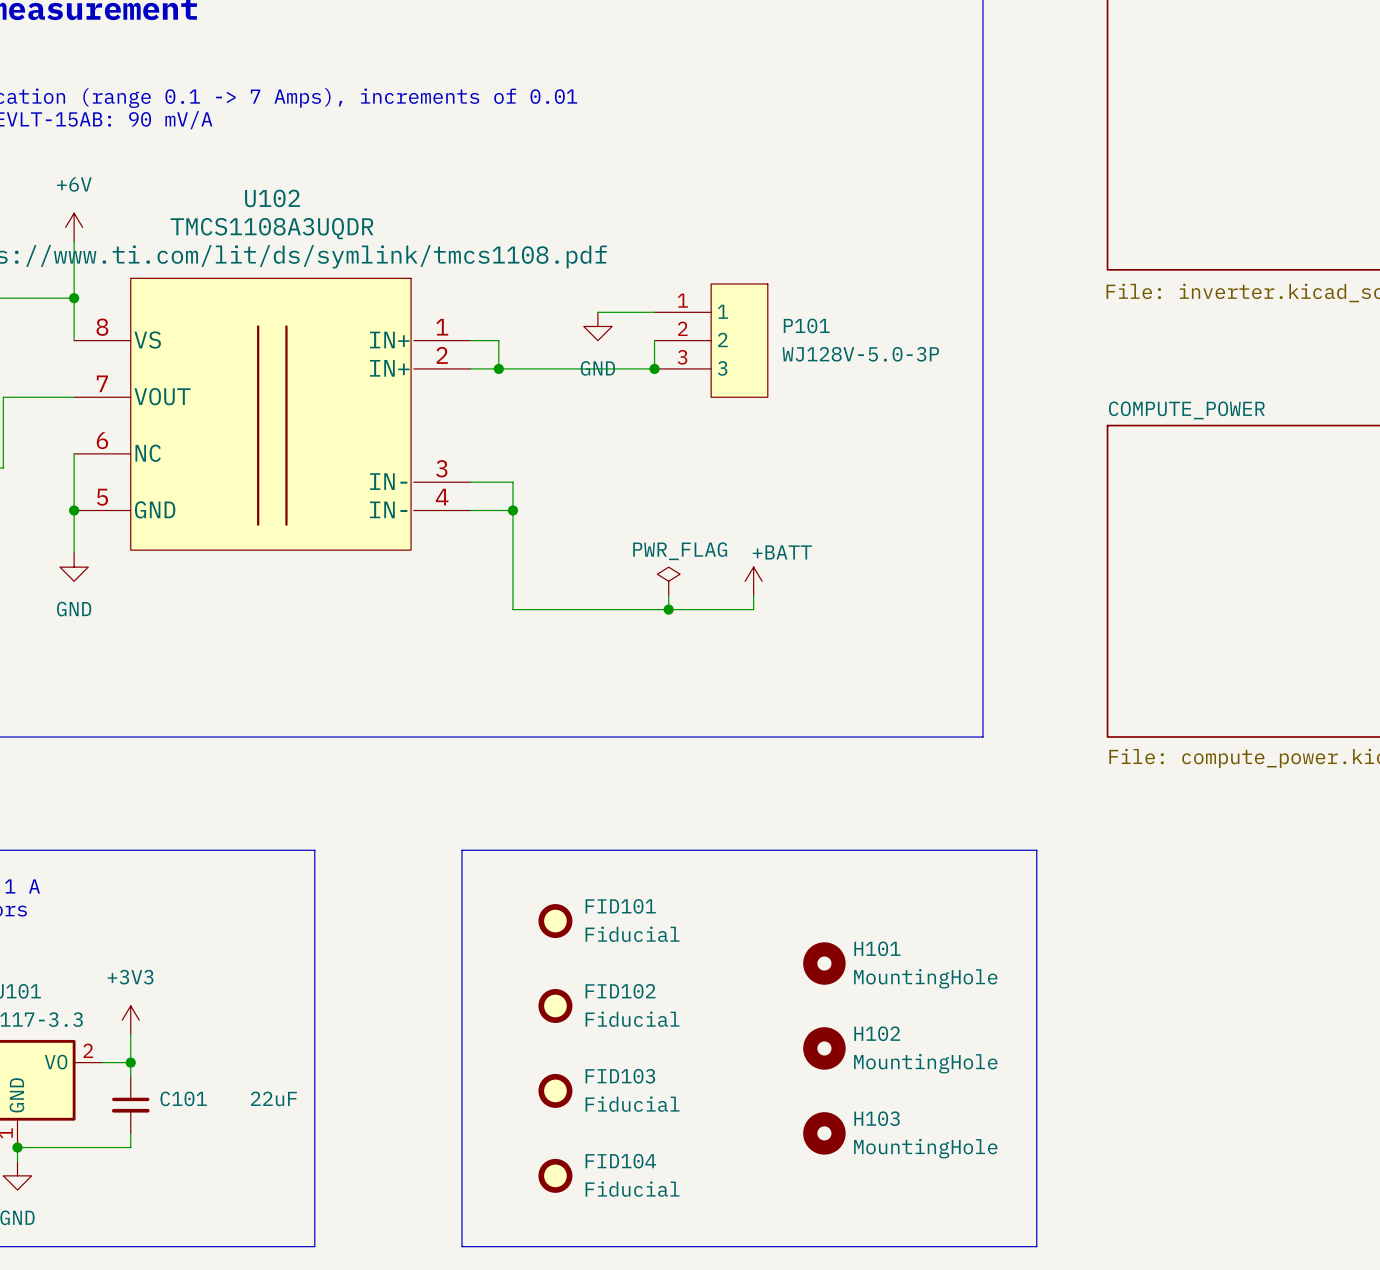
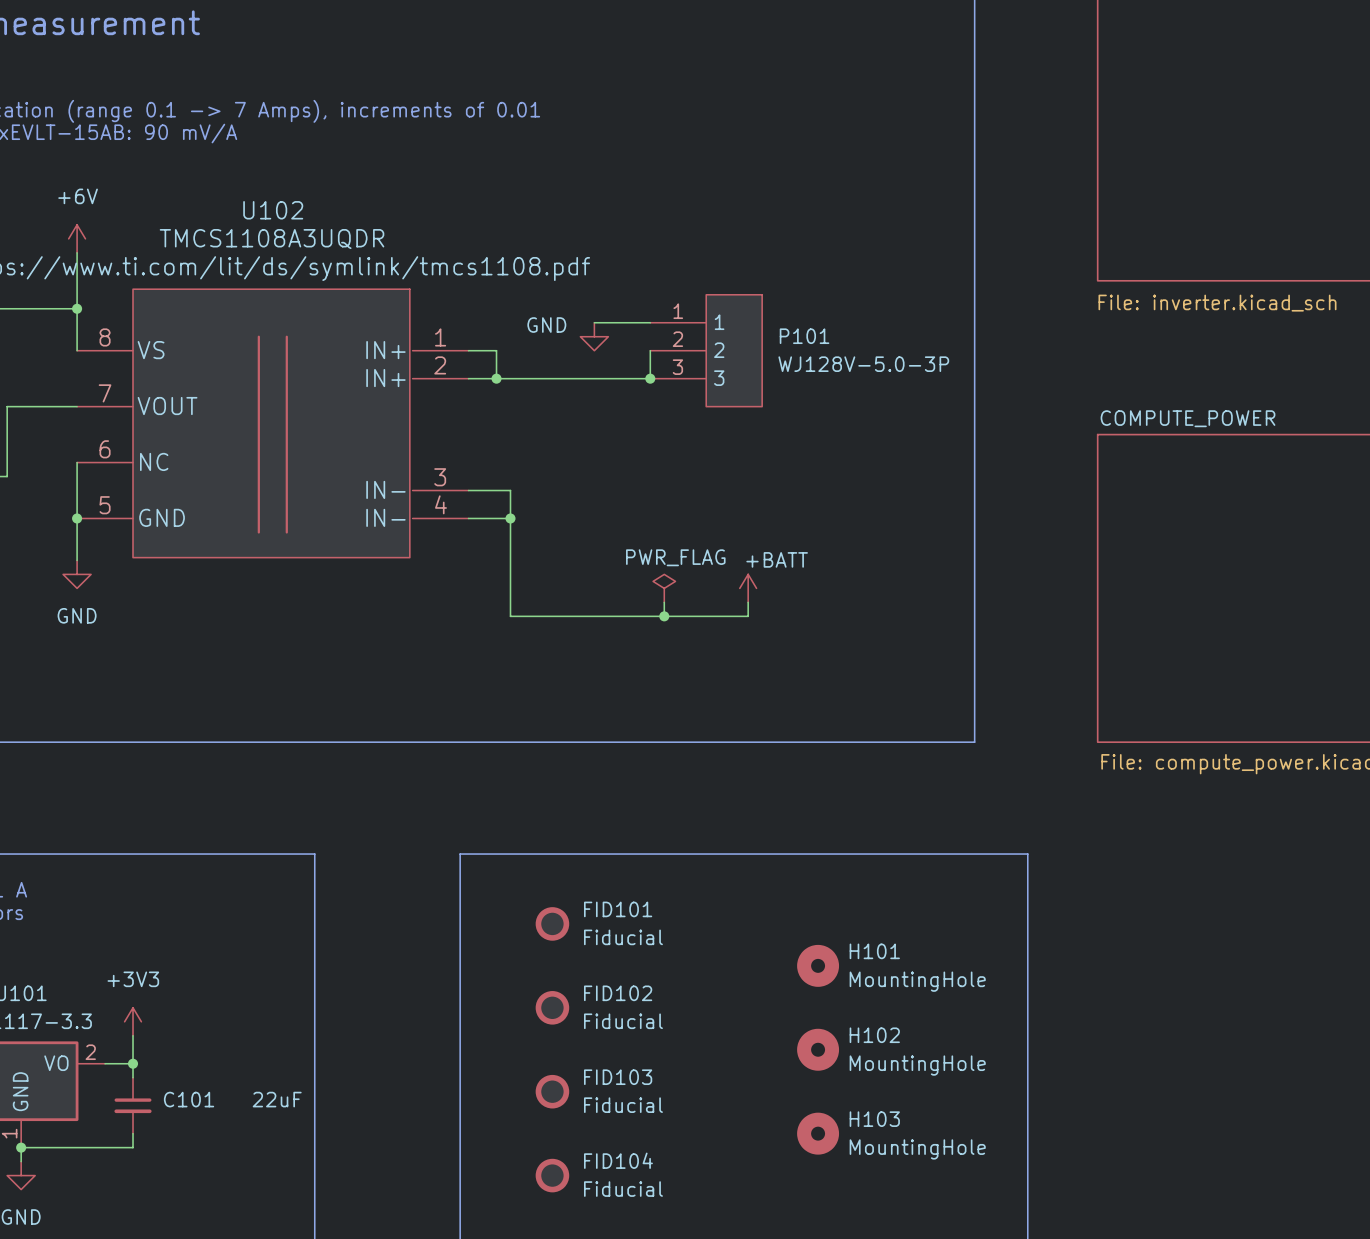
power symbol text position: GND (597, 368) -> GND (546, 325)

